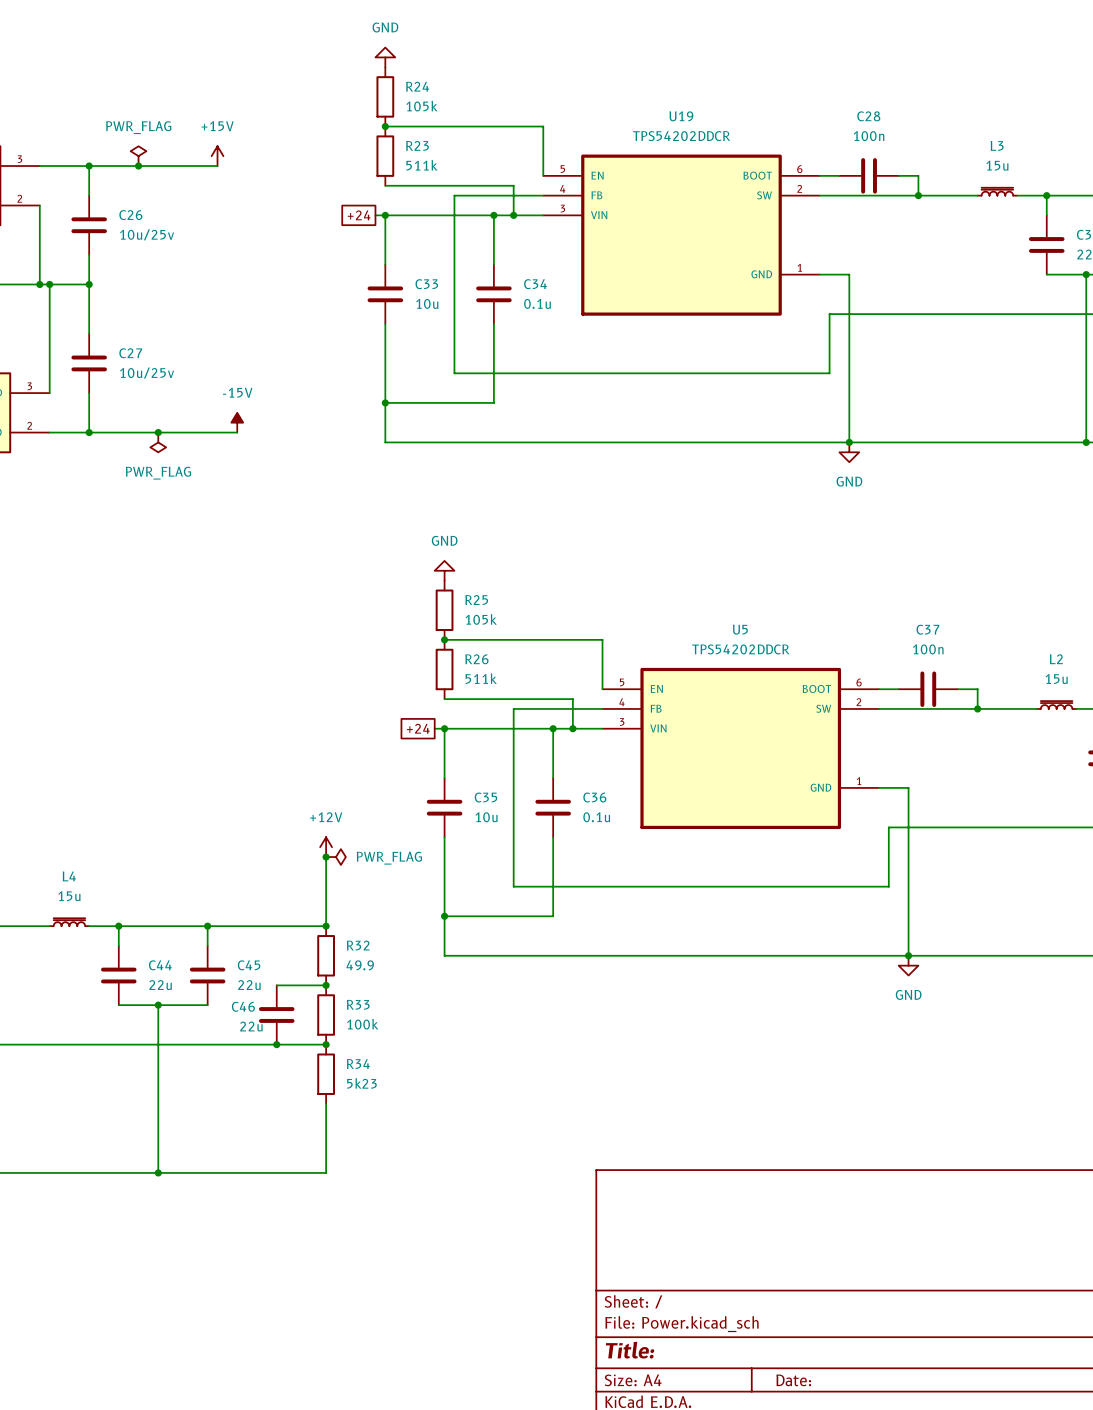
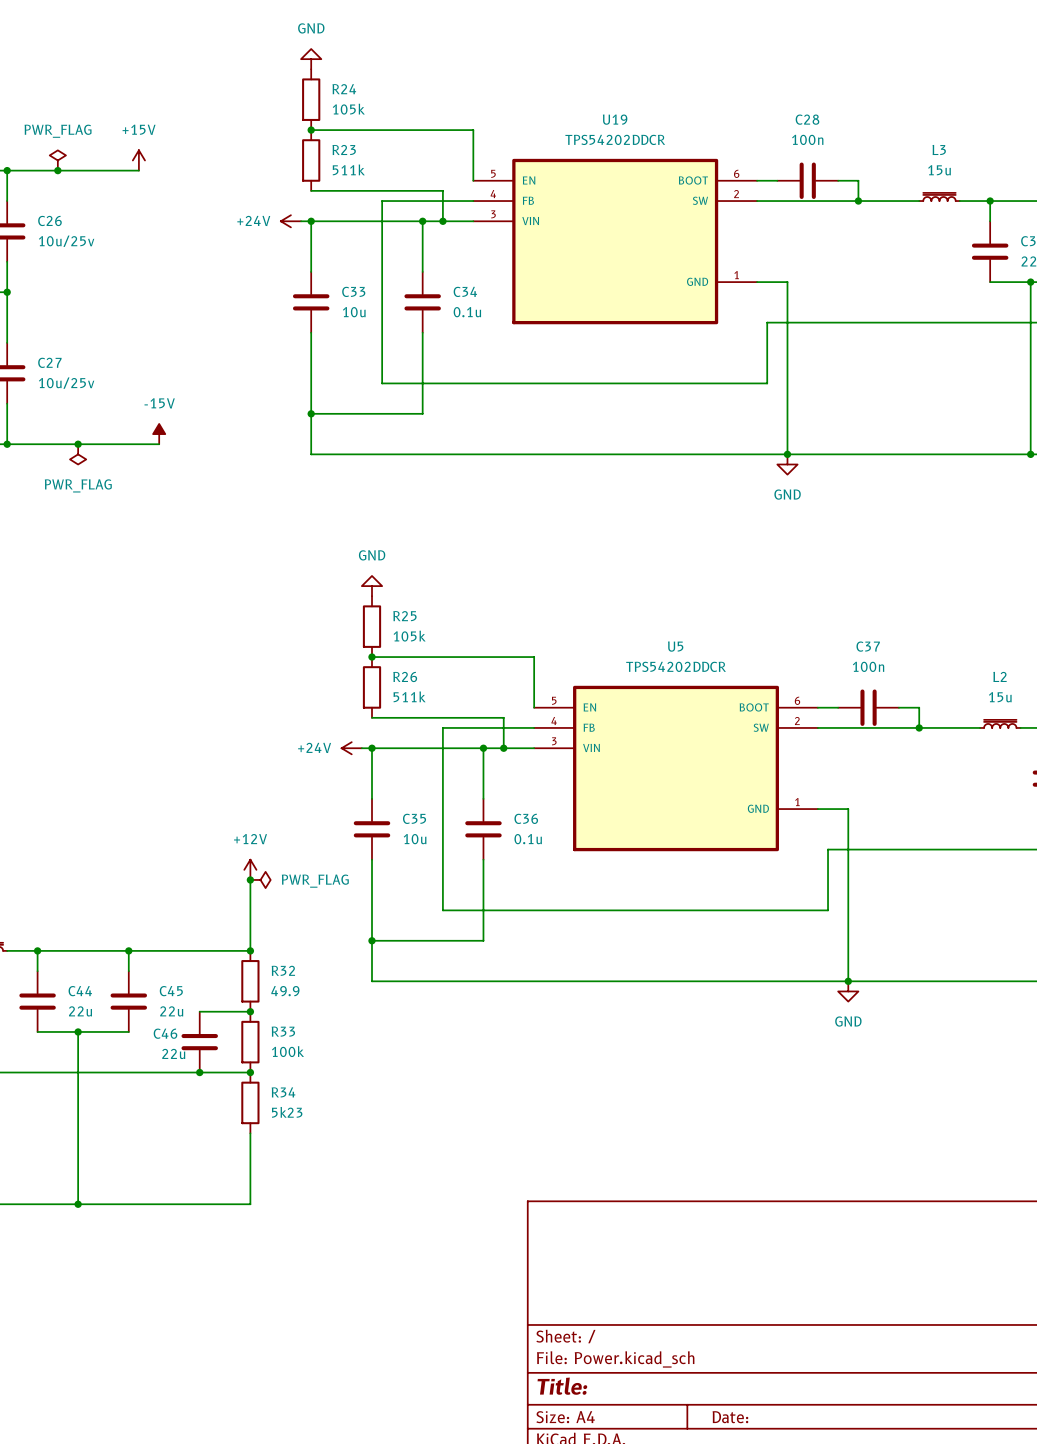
global label: +24 (359, 215) -> none
power symbol: none -> +24V (290, 221)
global label: +24 (418, 728) -> none
power symbol: none -> +24V (351, 748)

